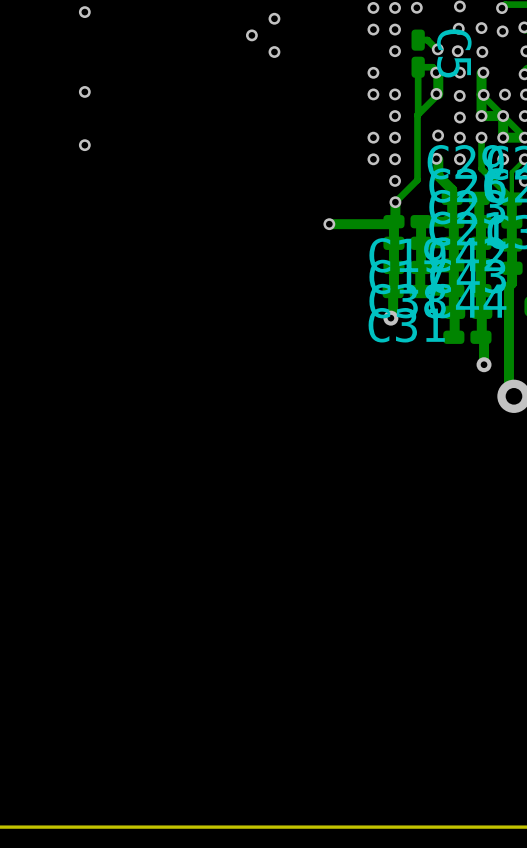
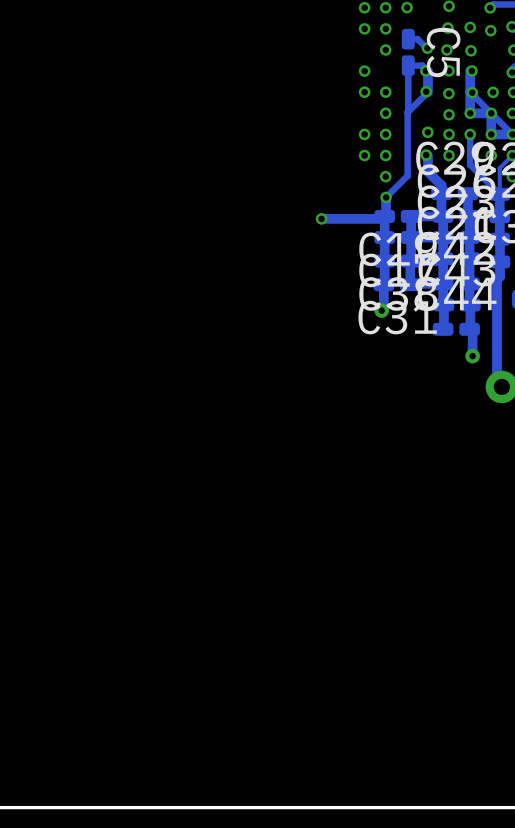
via: (84, 12) -> none
via: (274, 18) -> none
via: (251, 35) -> none
via: (274, 52) -> none
via: (84, 91) -> none
via: (84, 145) -> none

